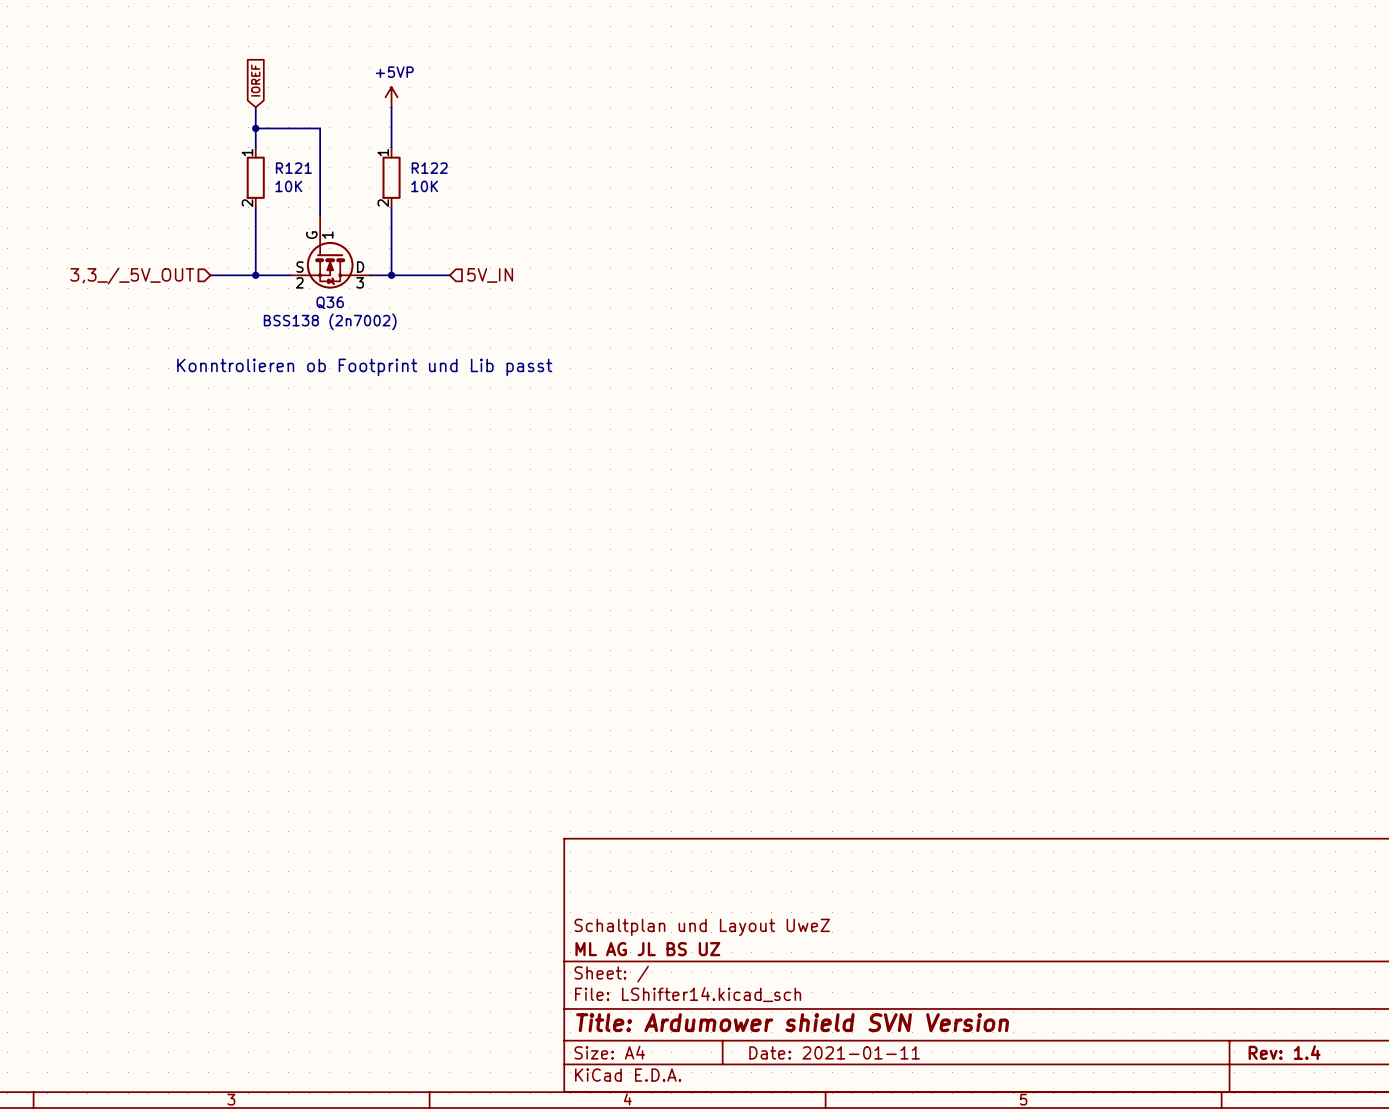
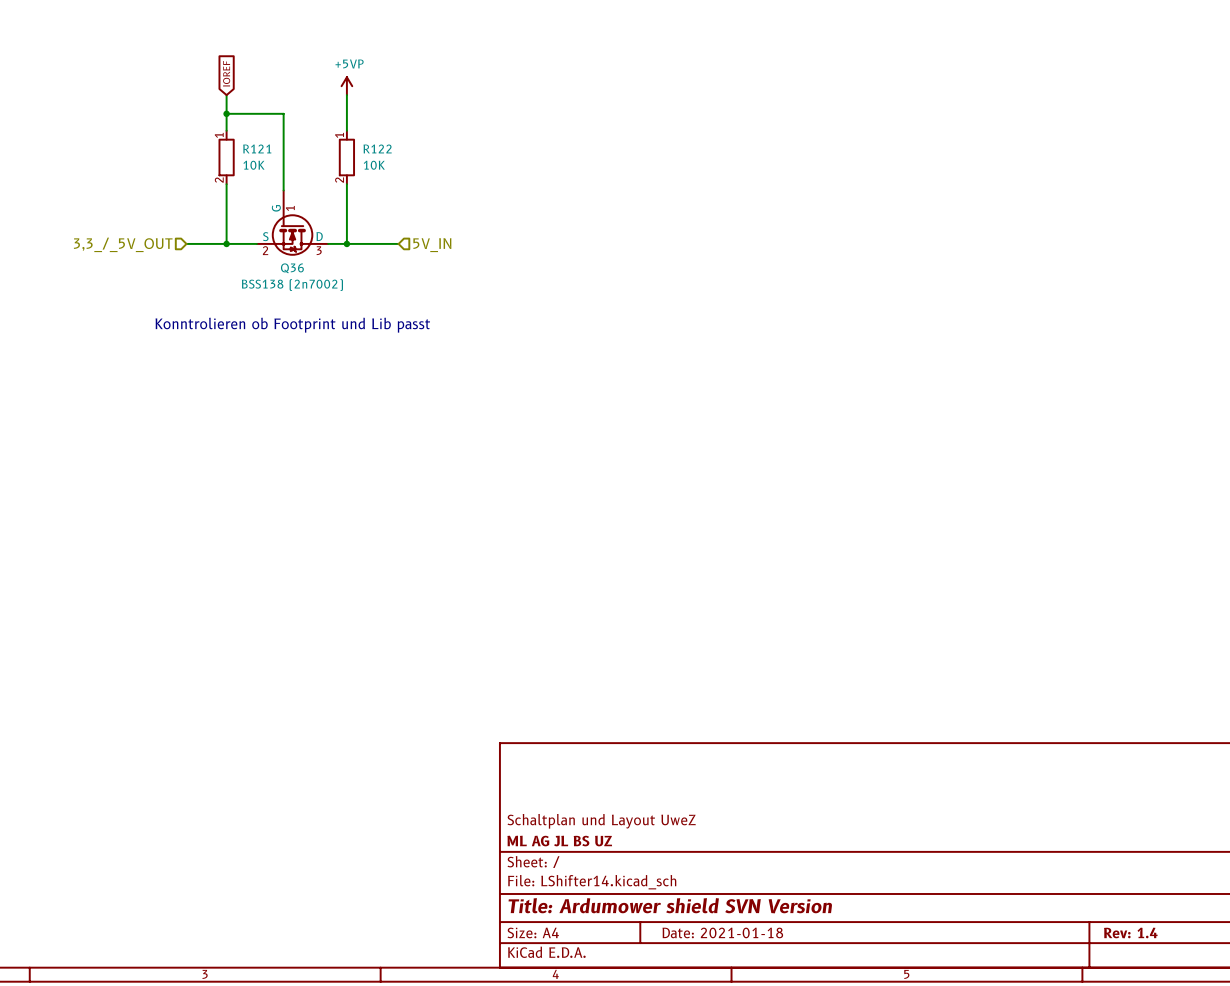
title block: Date: 2021-01-11 (834, 1052) -> Date: 2021-01-18 (722, 932)

